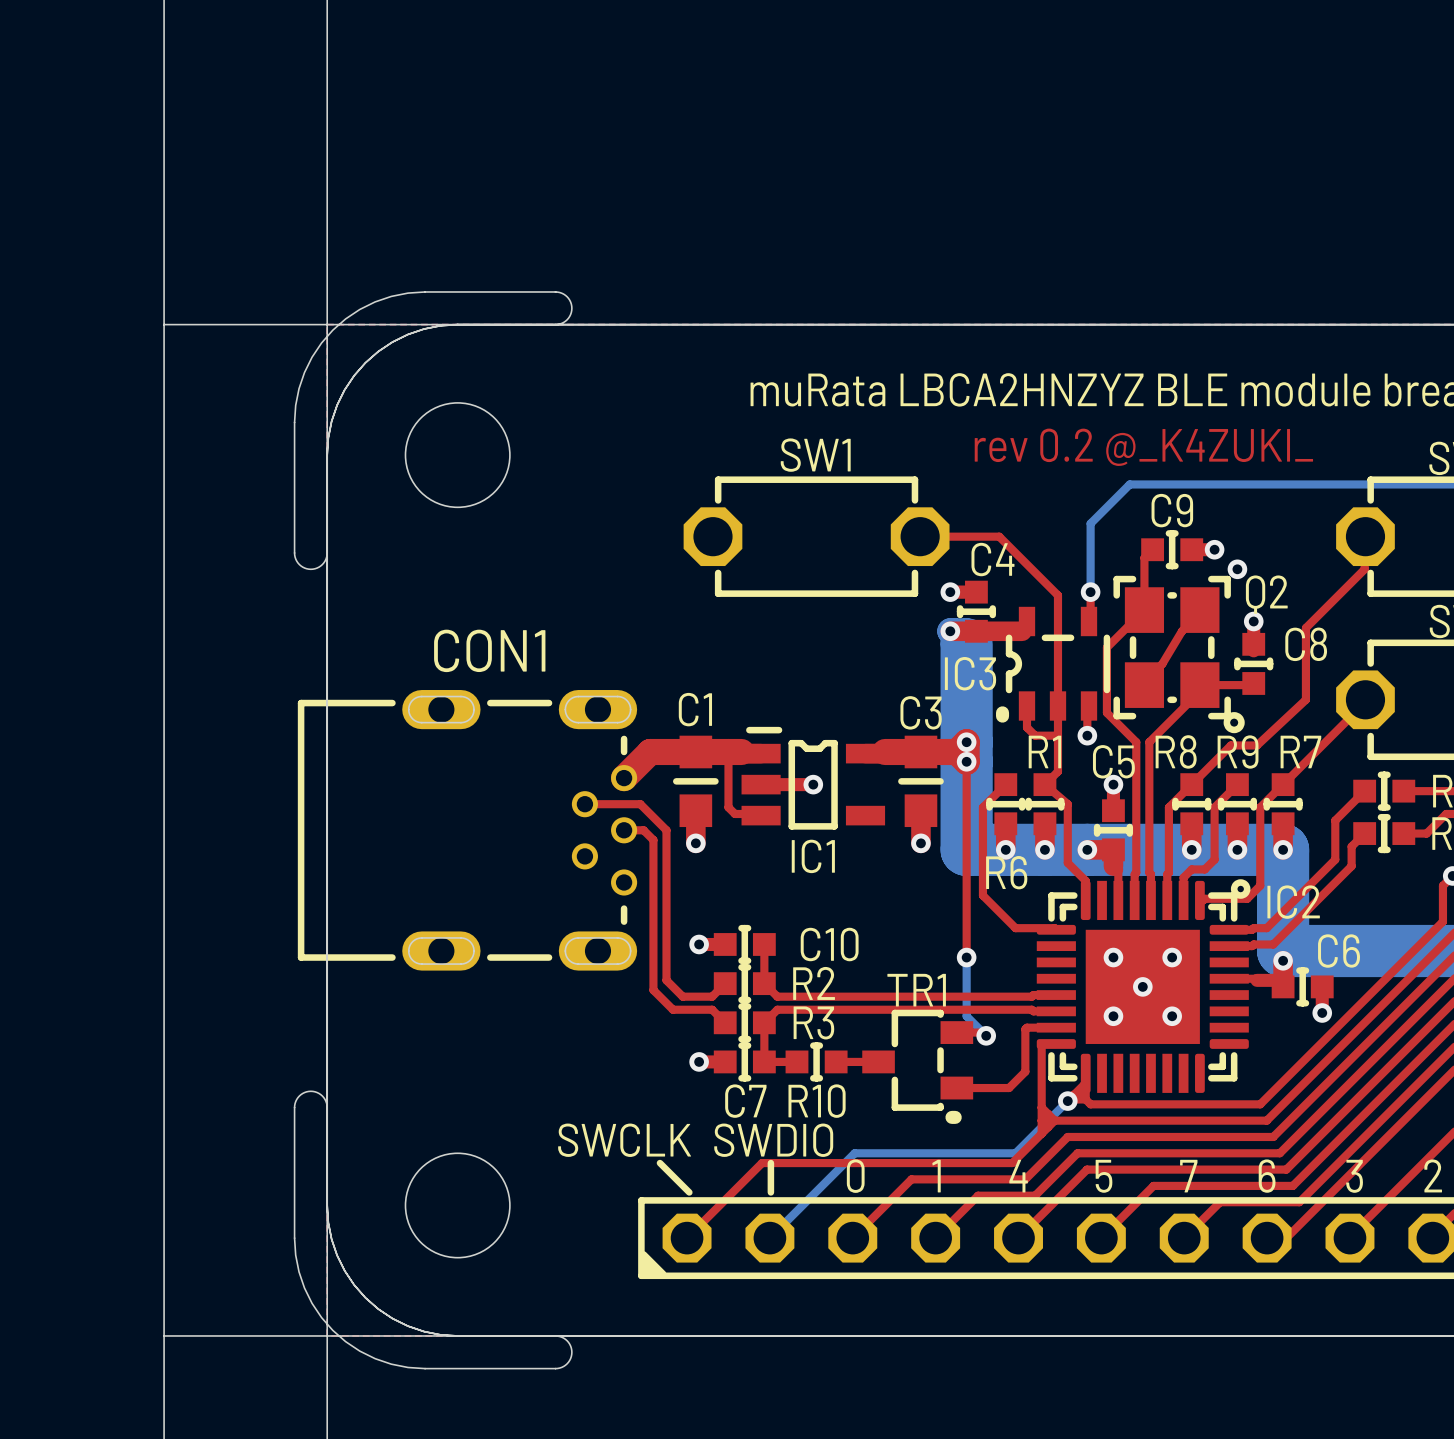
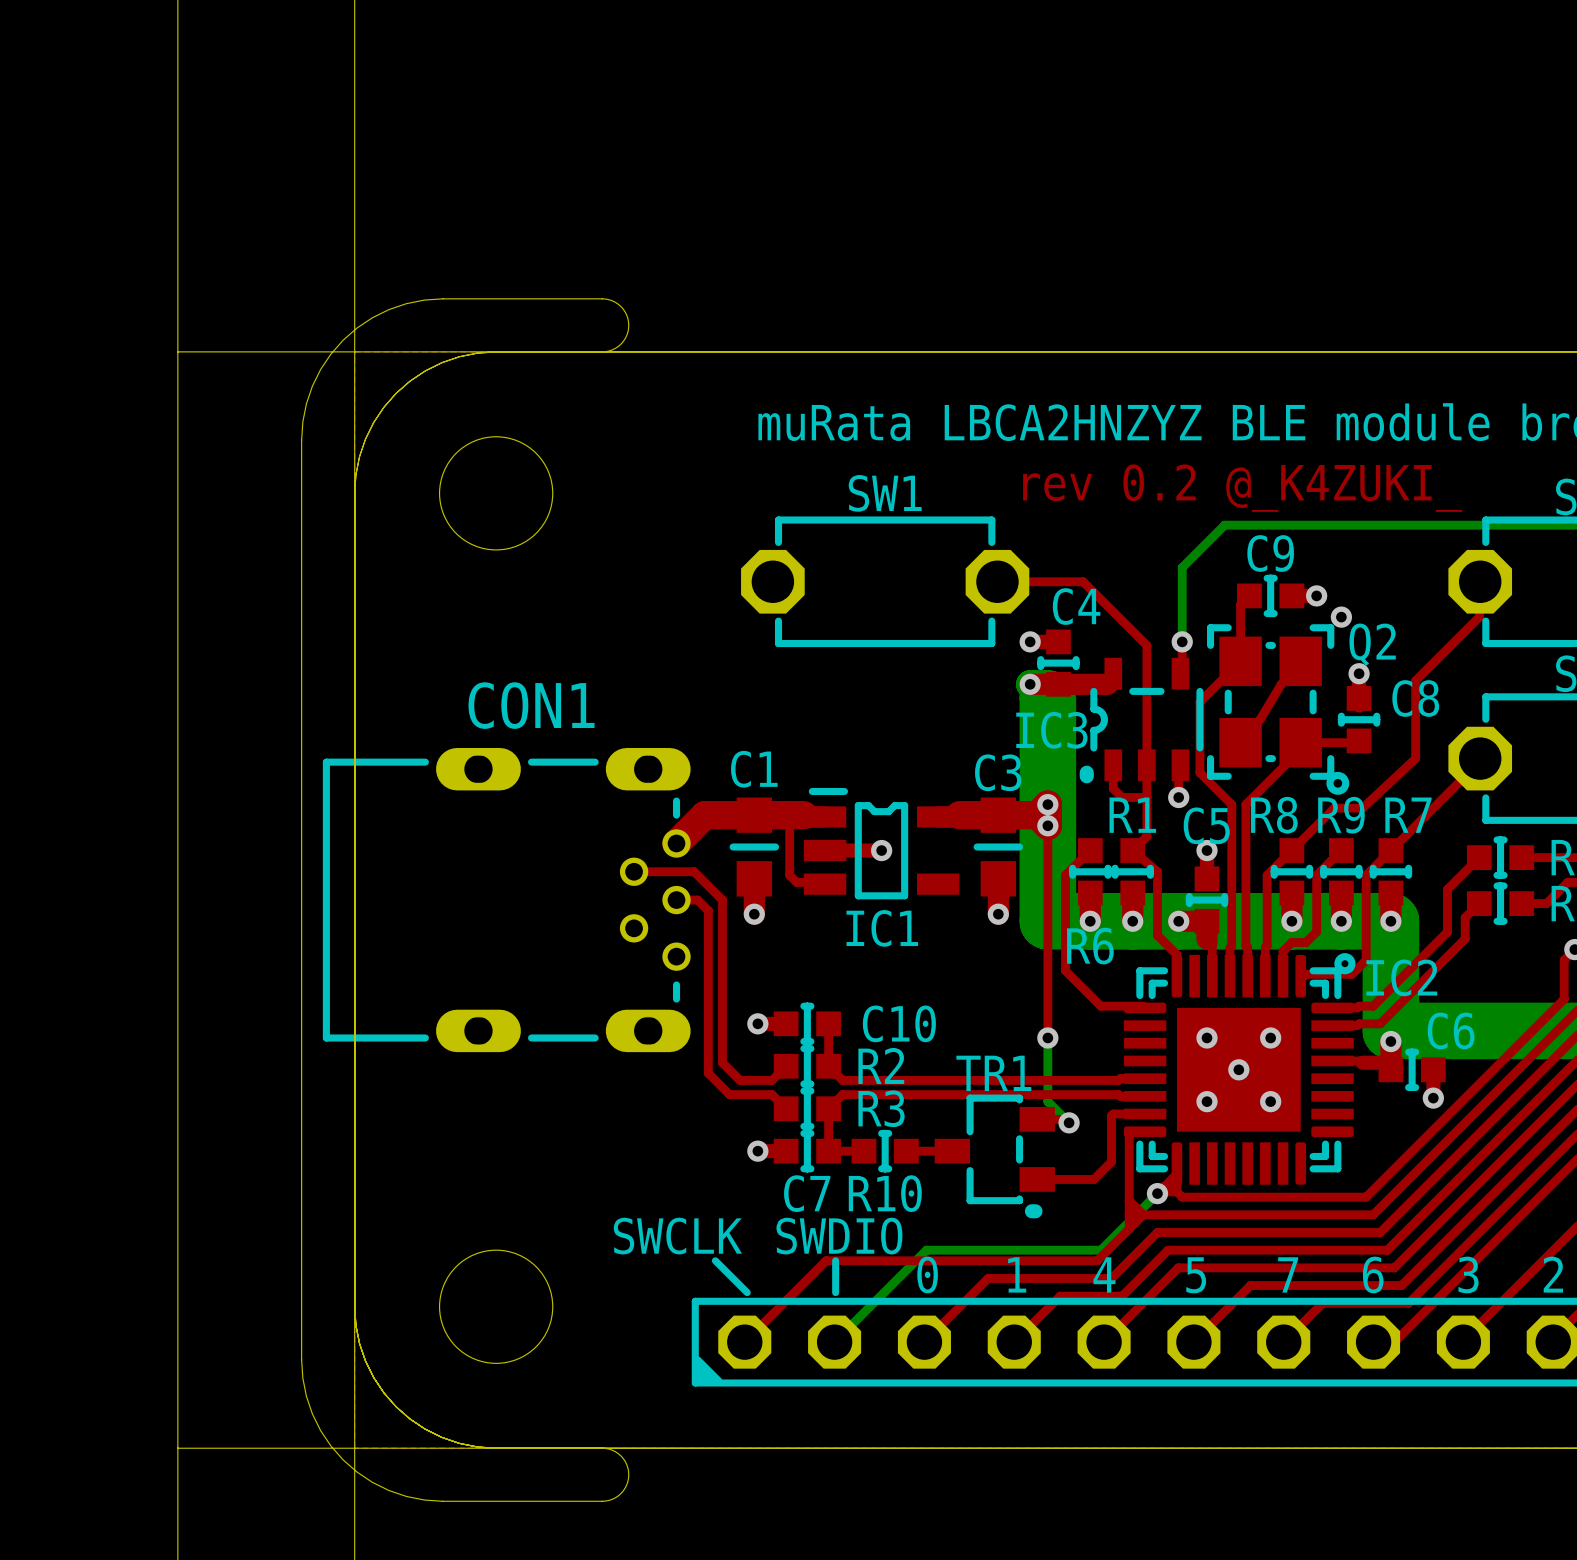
board edge: (555, 324) (567, 319) (571, 310) (568, 298) (559, 292) (425, 291) (408, 293) (375, 301) (359, 309) (332, 330) (312, 357) (304, 372) (295, 405) (294, 422) (295, 557) (300, 565) (313, 569) (322, 564) (327, 552) -> (602, 351) (618, 346) (625, 338) (628, 328) (627, 318) (623, 309) (609, 299) (443, 298) (406, 303) (372, 317) (343, 340) (330, 354) (320, 369) (306, 403) (301, 440) (301, 1359) (306, 1396) (320, 1430) (343, 1459) (372, 1482) (406, 1496) (424, 1500) (609, 1500) (623, 1490) (627, 1481) (628, 1471) (625, 1461) (618, 1453) (602, 1448)
board edge: (327, 1107) (322, 1096) (313, 1091) (300, 1094) (295, 1103) (294, 1238) (295, 1255) (304, 1288) (312, 1303) (332, 1330) (359, 1351) (375, 1358) (408, 1367) (425, 1368) (559, 1368) (568, 1362) (571, 1350) (567, 1340) (555, 1335) -> none

